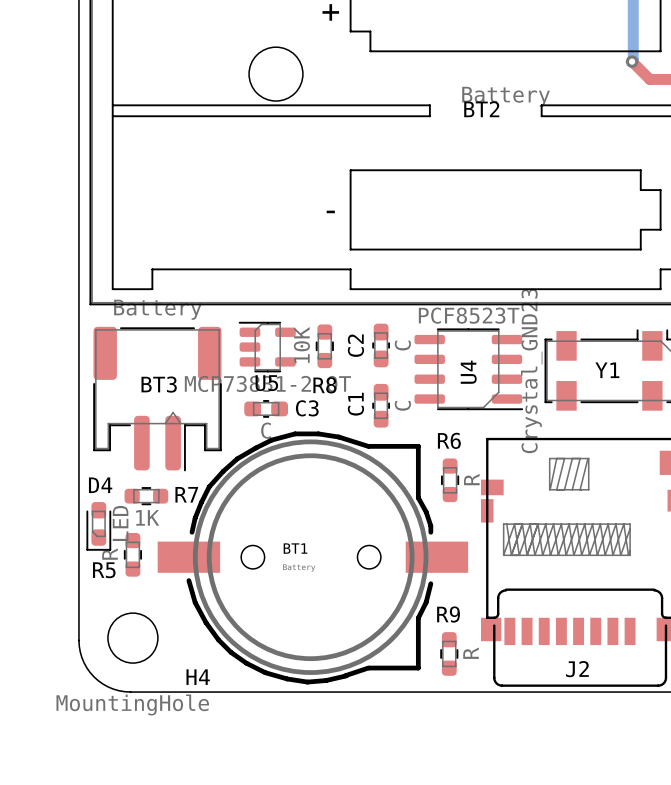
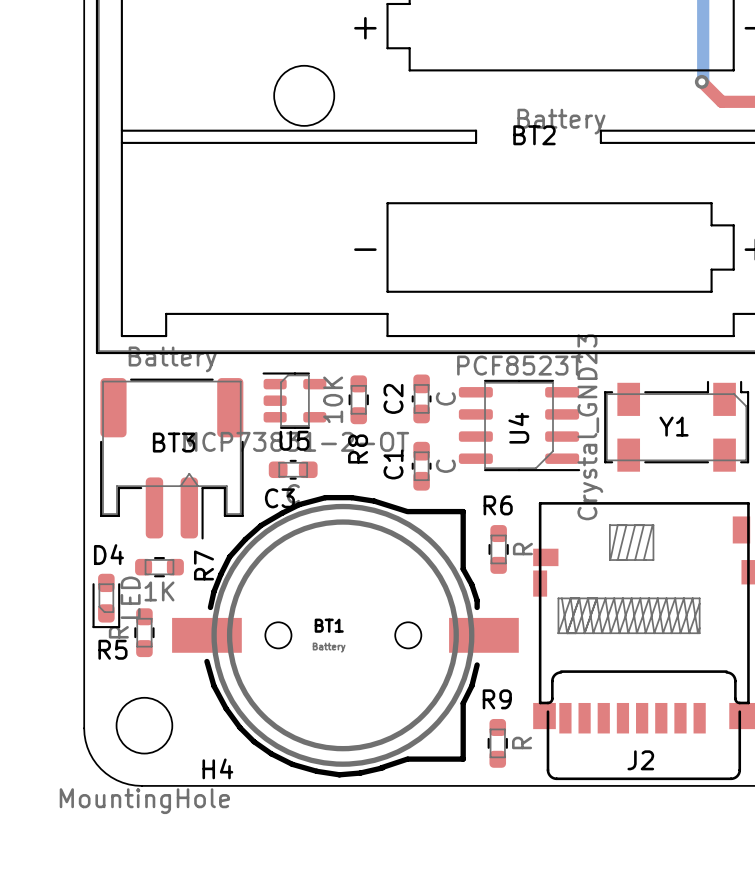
R8 name rotation: 0° (324, 385) -> 90° counterclockwise (358, 448)
C3 name position: C3 (307, 408) -> C3 (279, 498)
R7 name rotation: 0° (186, 494) -> 90° counterclockwise (204, 565)

